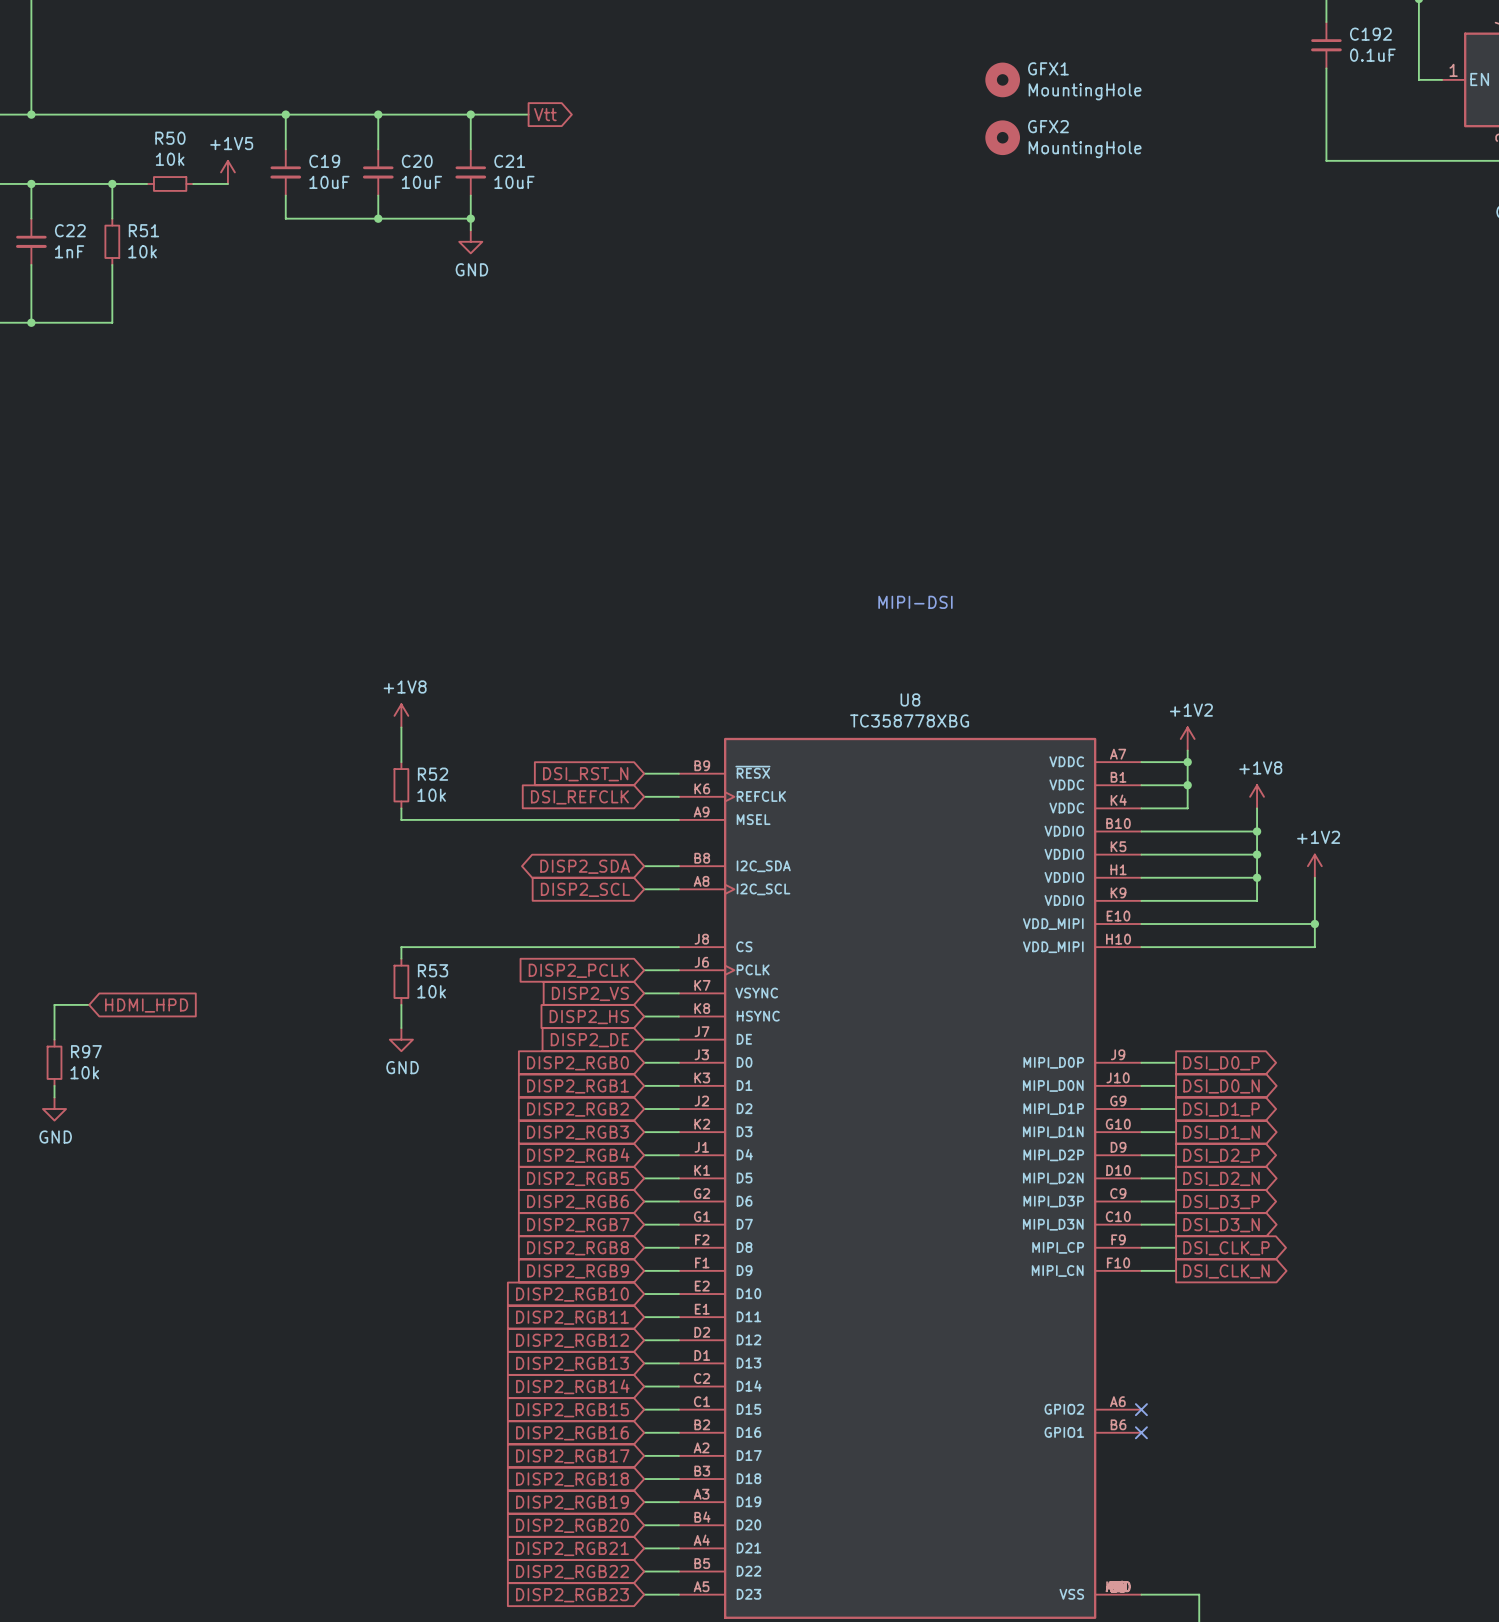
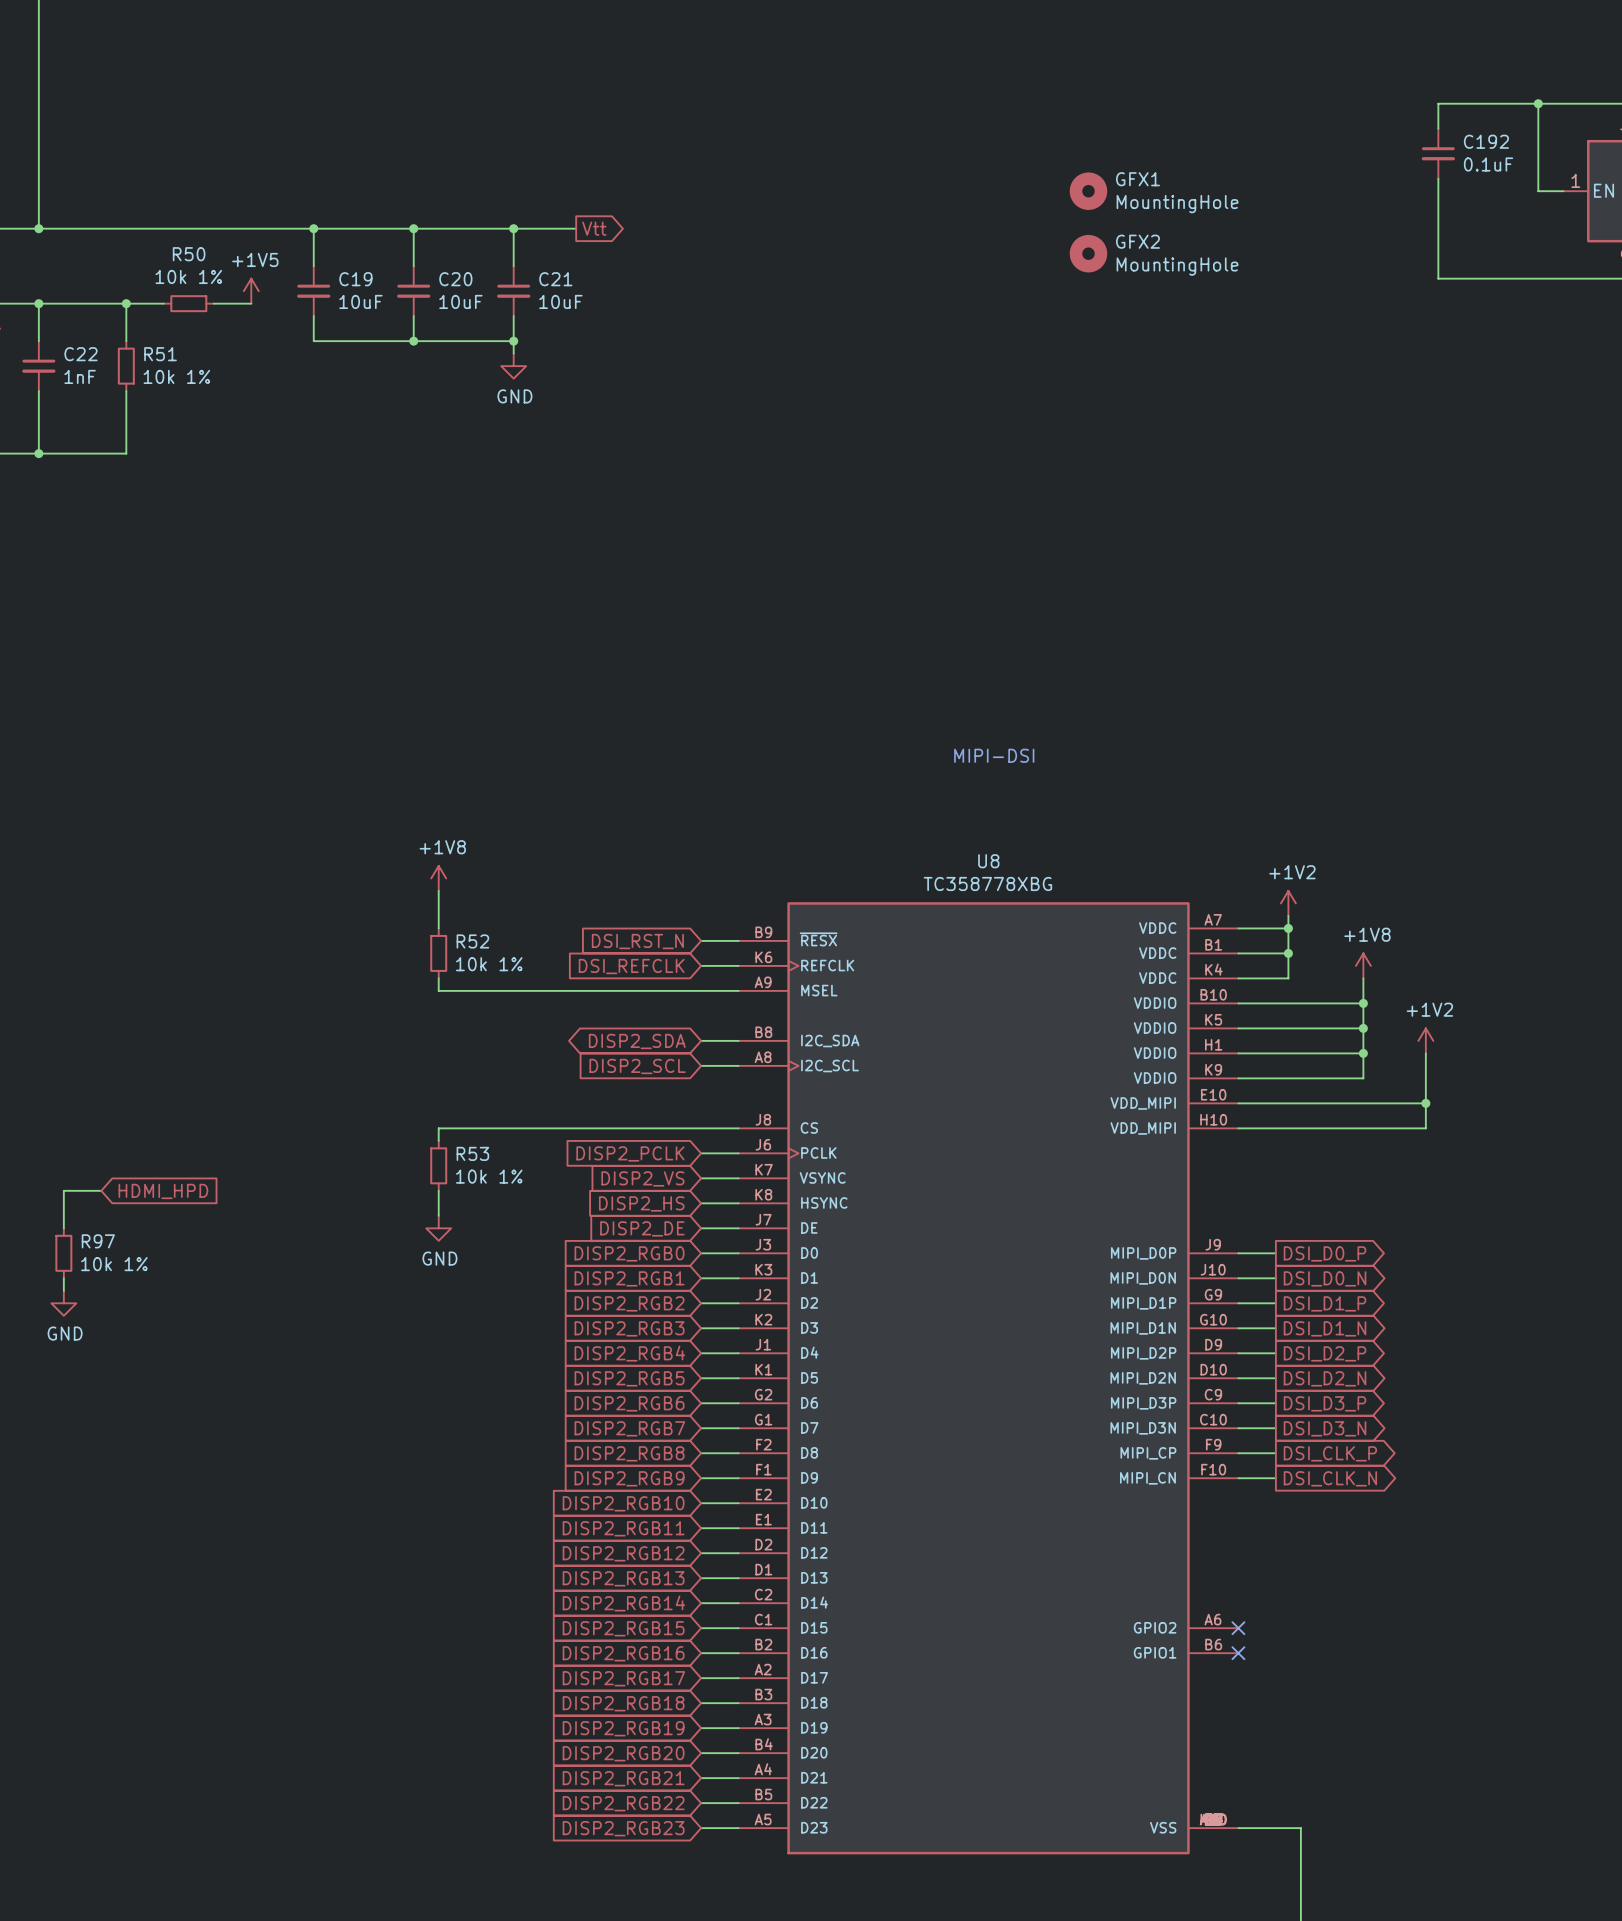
R50 value: 10k (170, 159) -> 10k 1% (188, 276)
R51 value: 10k (142, 251) -> 10k 1% (176, 376)
R52 value: 10k (431, 795) -> 10k 1% (489, 964)
R53 value: 10k (431, 991) -> 10k 1% (489, 1176)
R97 value: 10k (84, 1072) -> 10k 1% (114, 1264)

